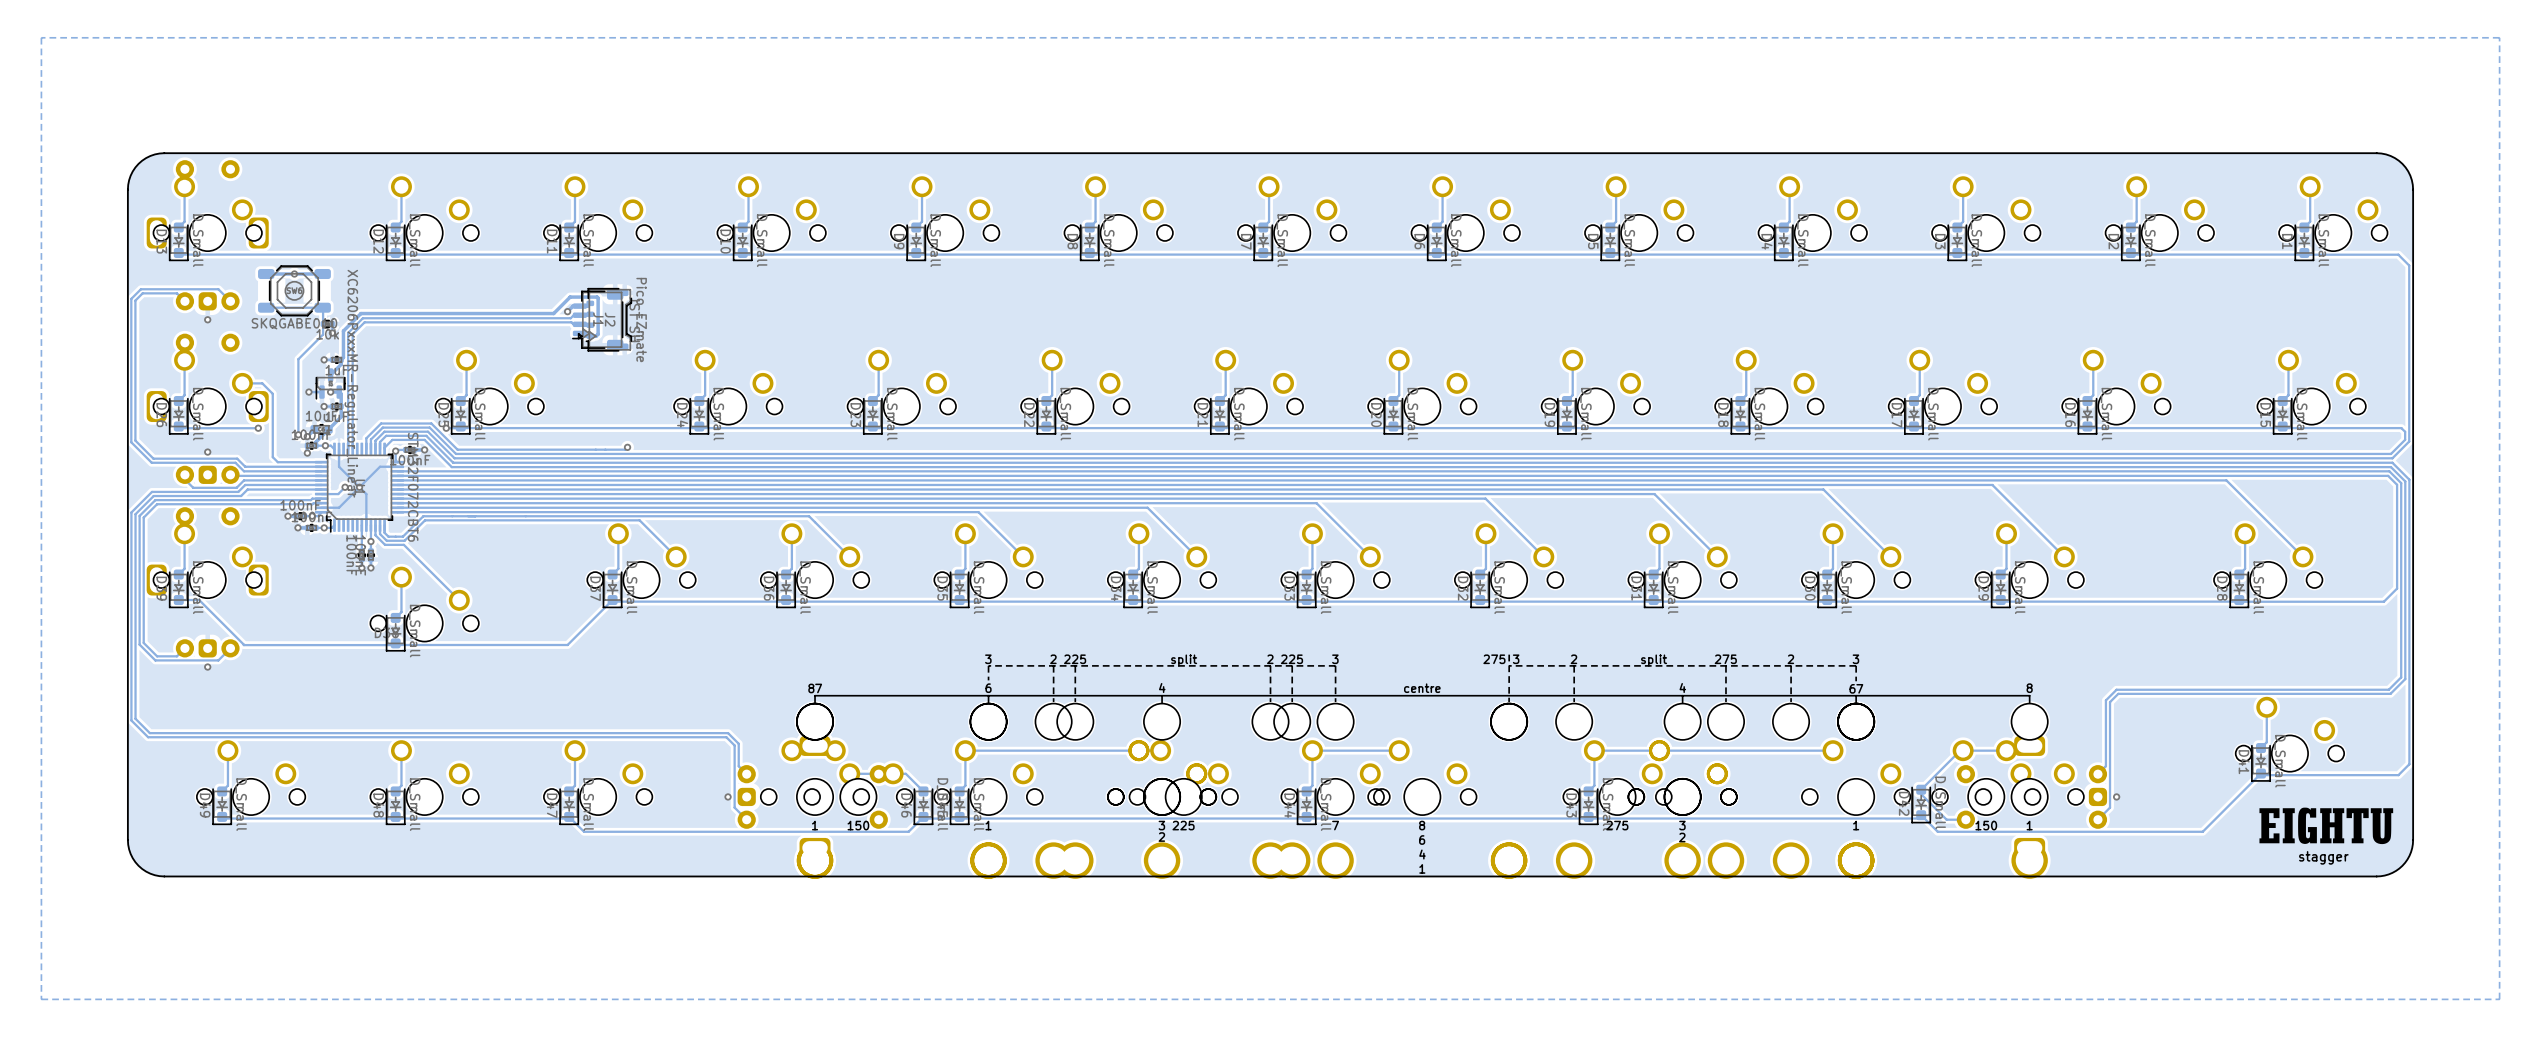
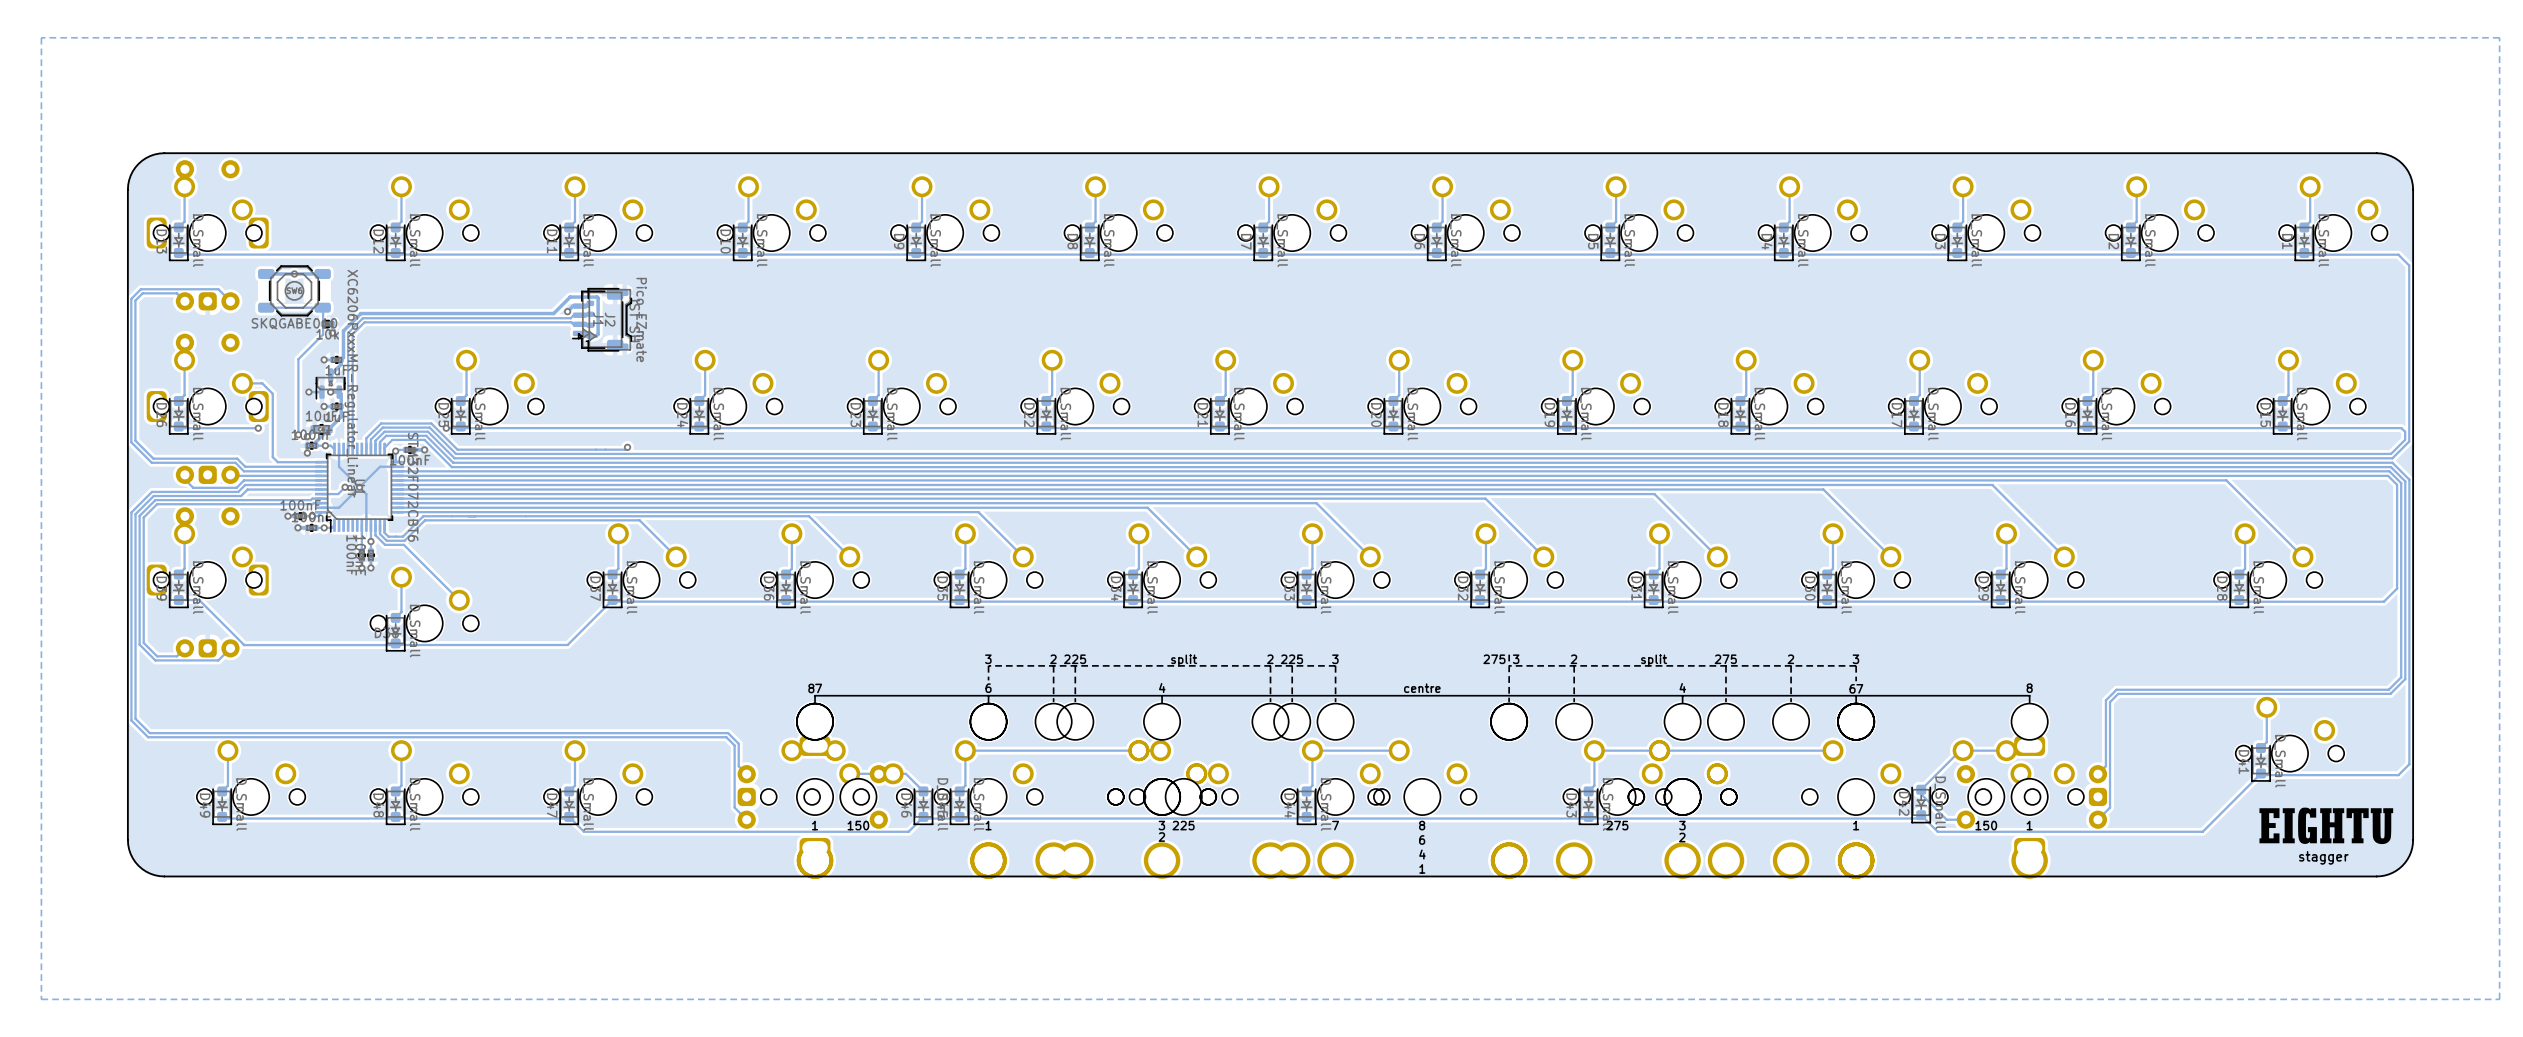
via: (207, 319) -> none
via: (207, 452) -> none
via: (207, 667) -> none
via: (728, 796) -> none
via: (2116, 796) -> none

